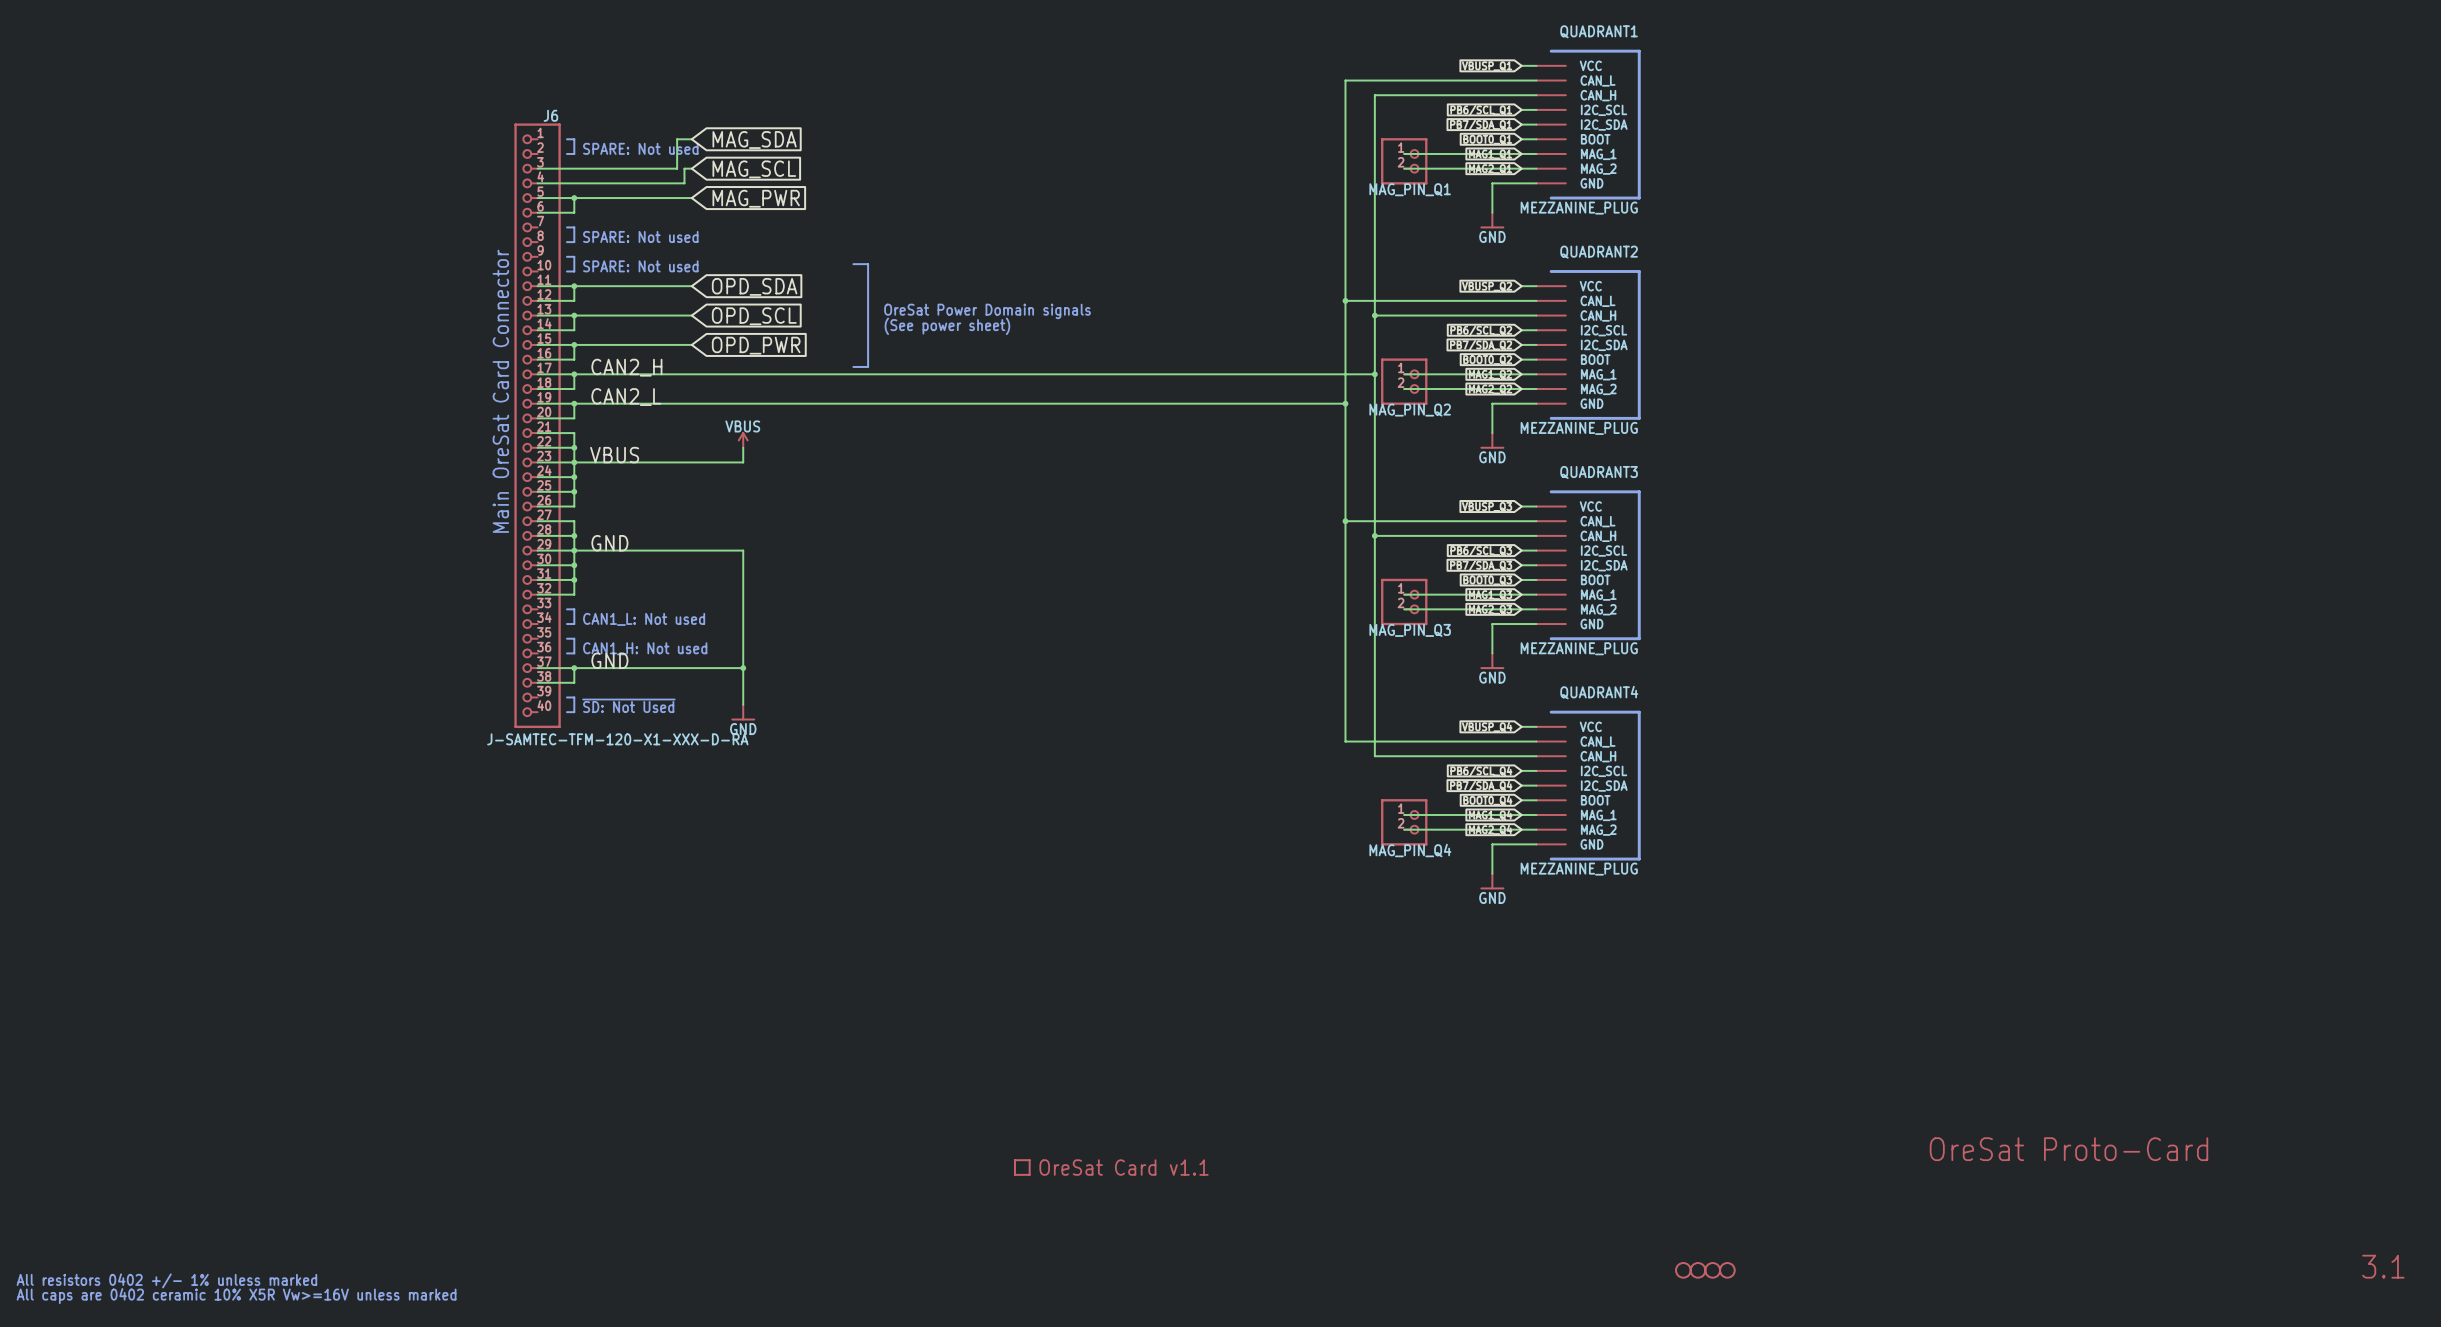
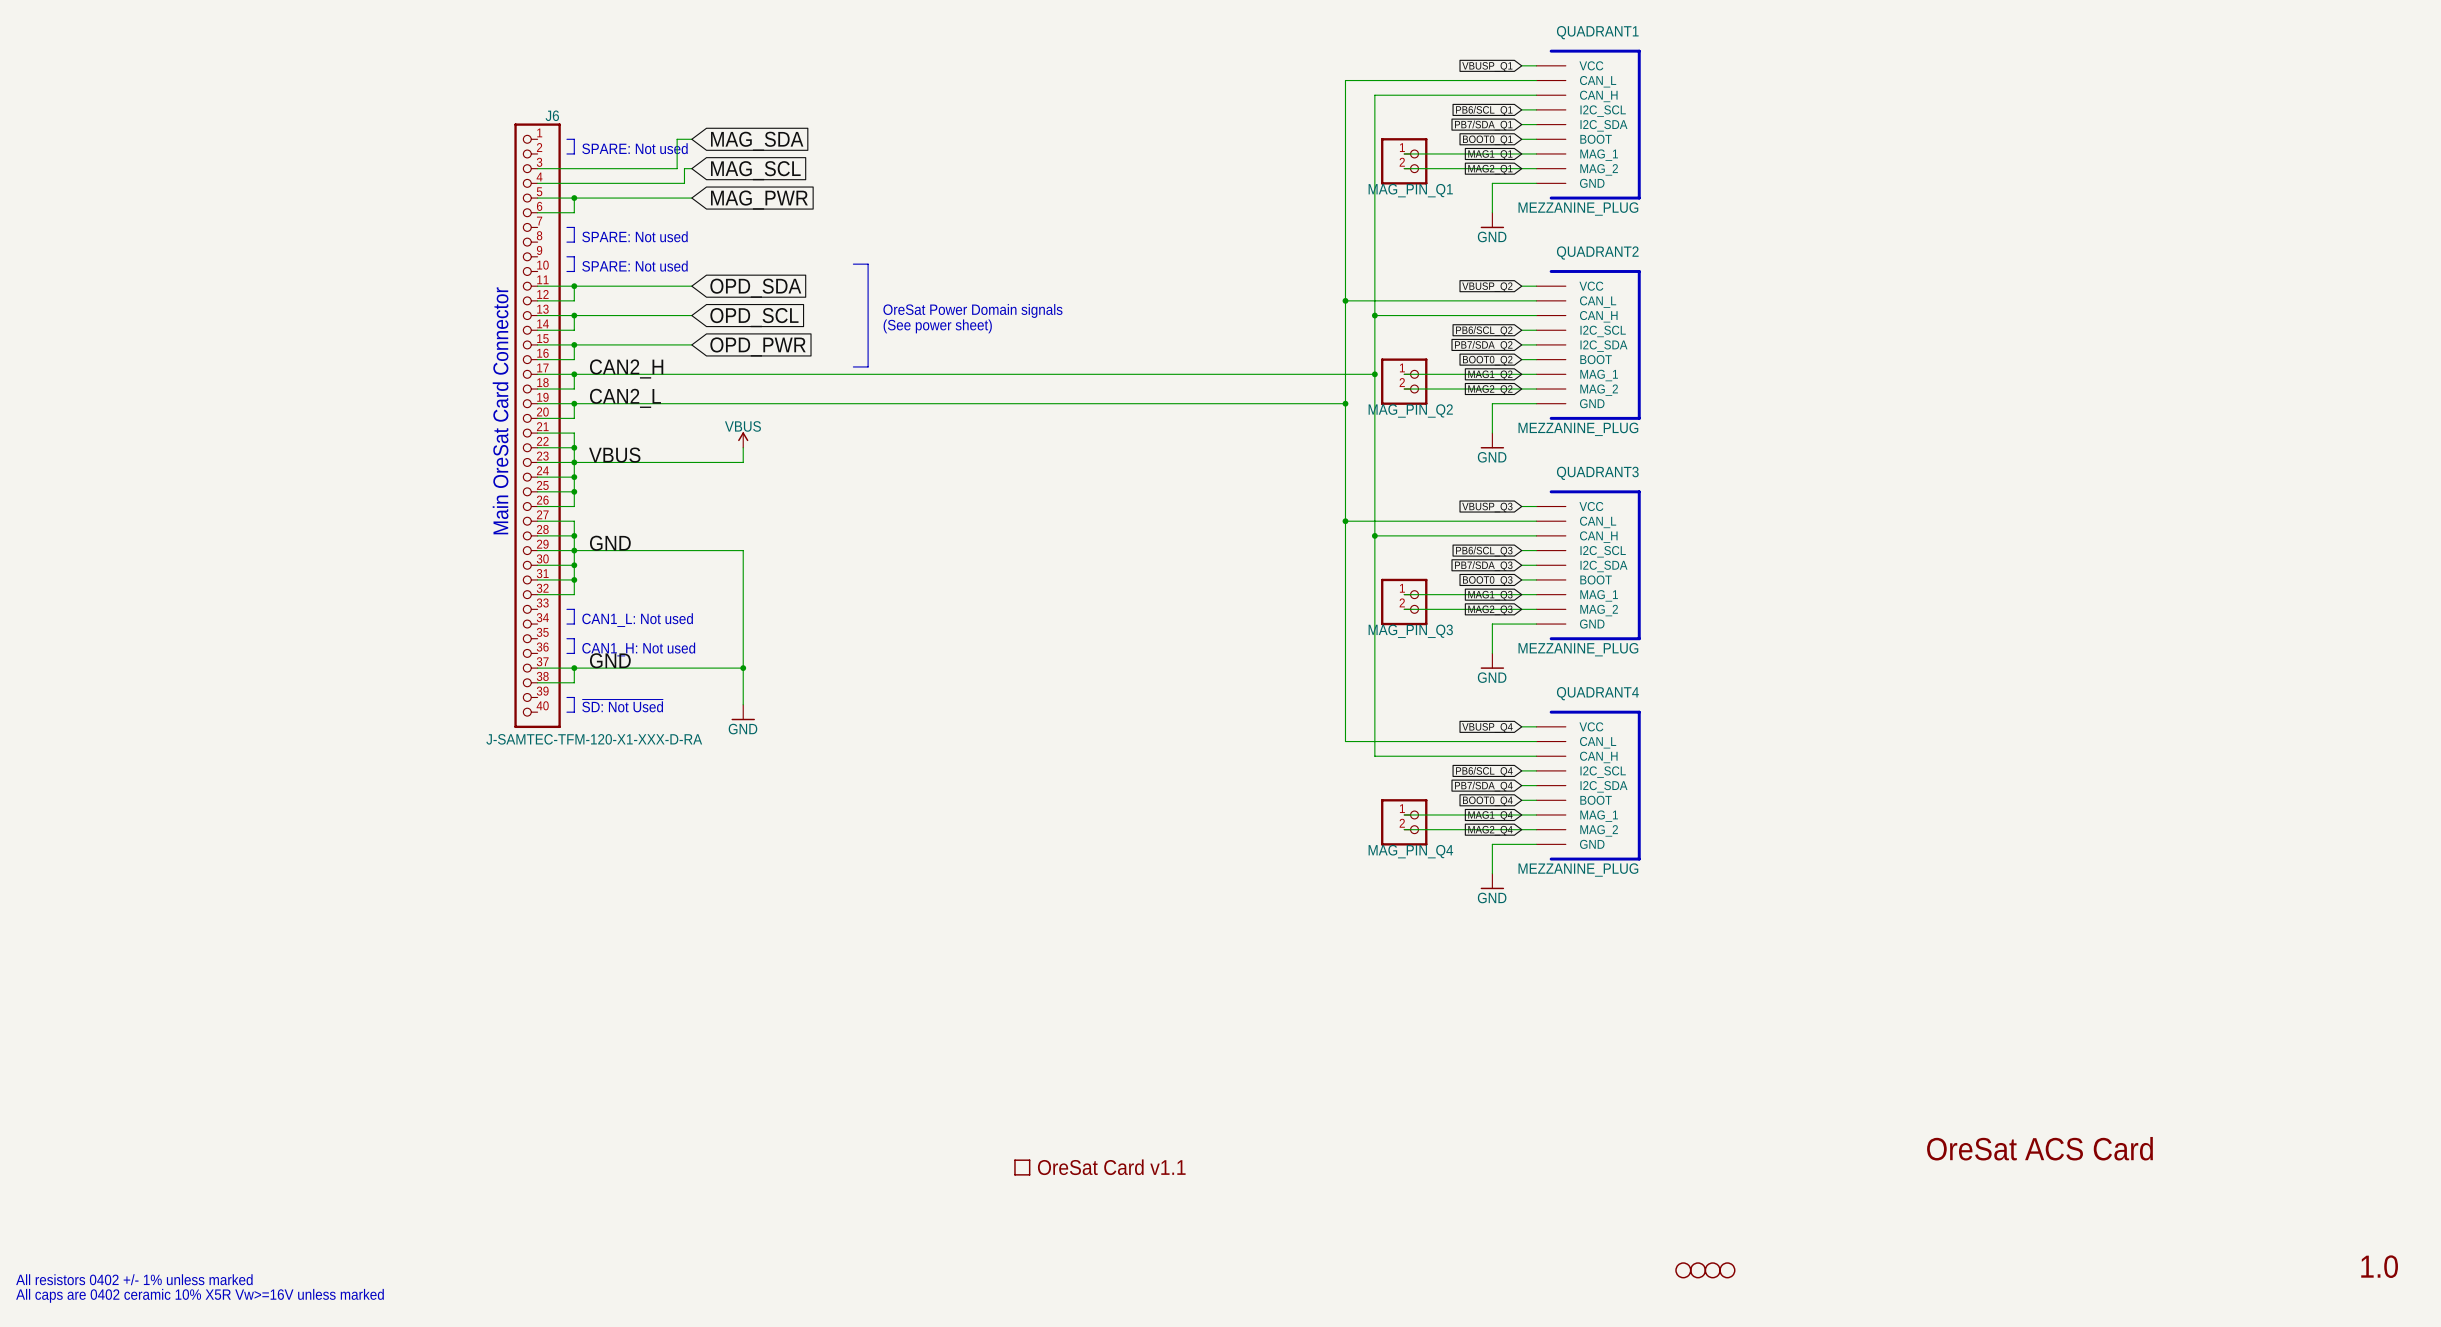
text: OreSat Proto-Card (2068, 1149) -> OreSat ACS Card (2040, 1148)
text: 3.1 (2383, 1266) -> 1.0 (2379, 1266)

